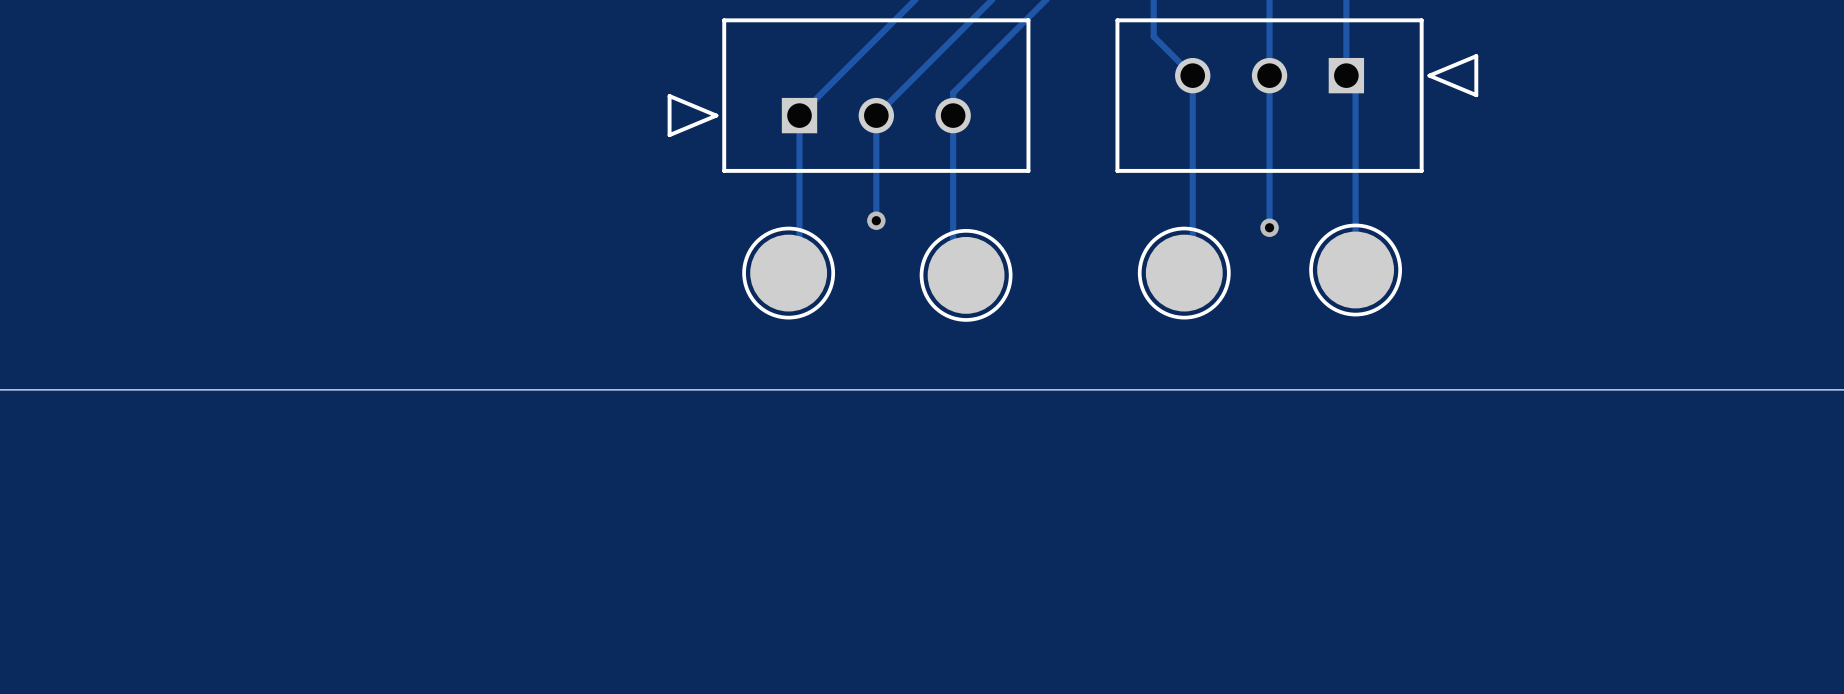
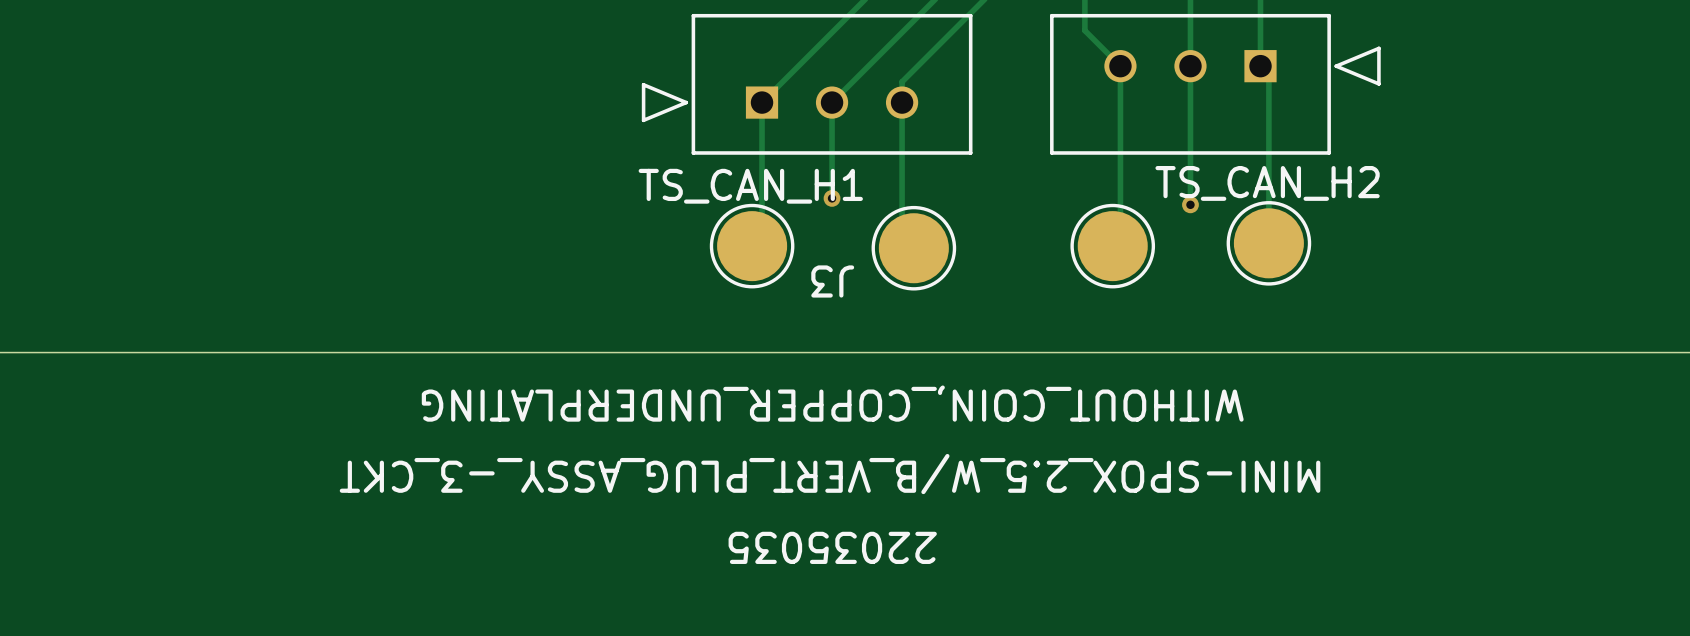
TS_CAN_H2 name: none -> TS_CAN_H2 (1267, 183)
TS_CAN_H1 name: none -> TS_CAN_H1 (750, 186)
J3 name: none -> J3 (832, 281)
J3 text: none -> WITHOUT_COIN,_COPPER_UNDERPLATING (832, 403)
J3 text: none -> MINI-SPOX_2.5_W/B_VERT_PLUG_ASSY_-3_CKT (830, 474)
J3 text: none -> 22035035 (832, 547)

